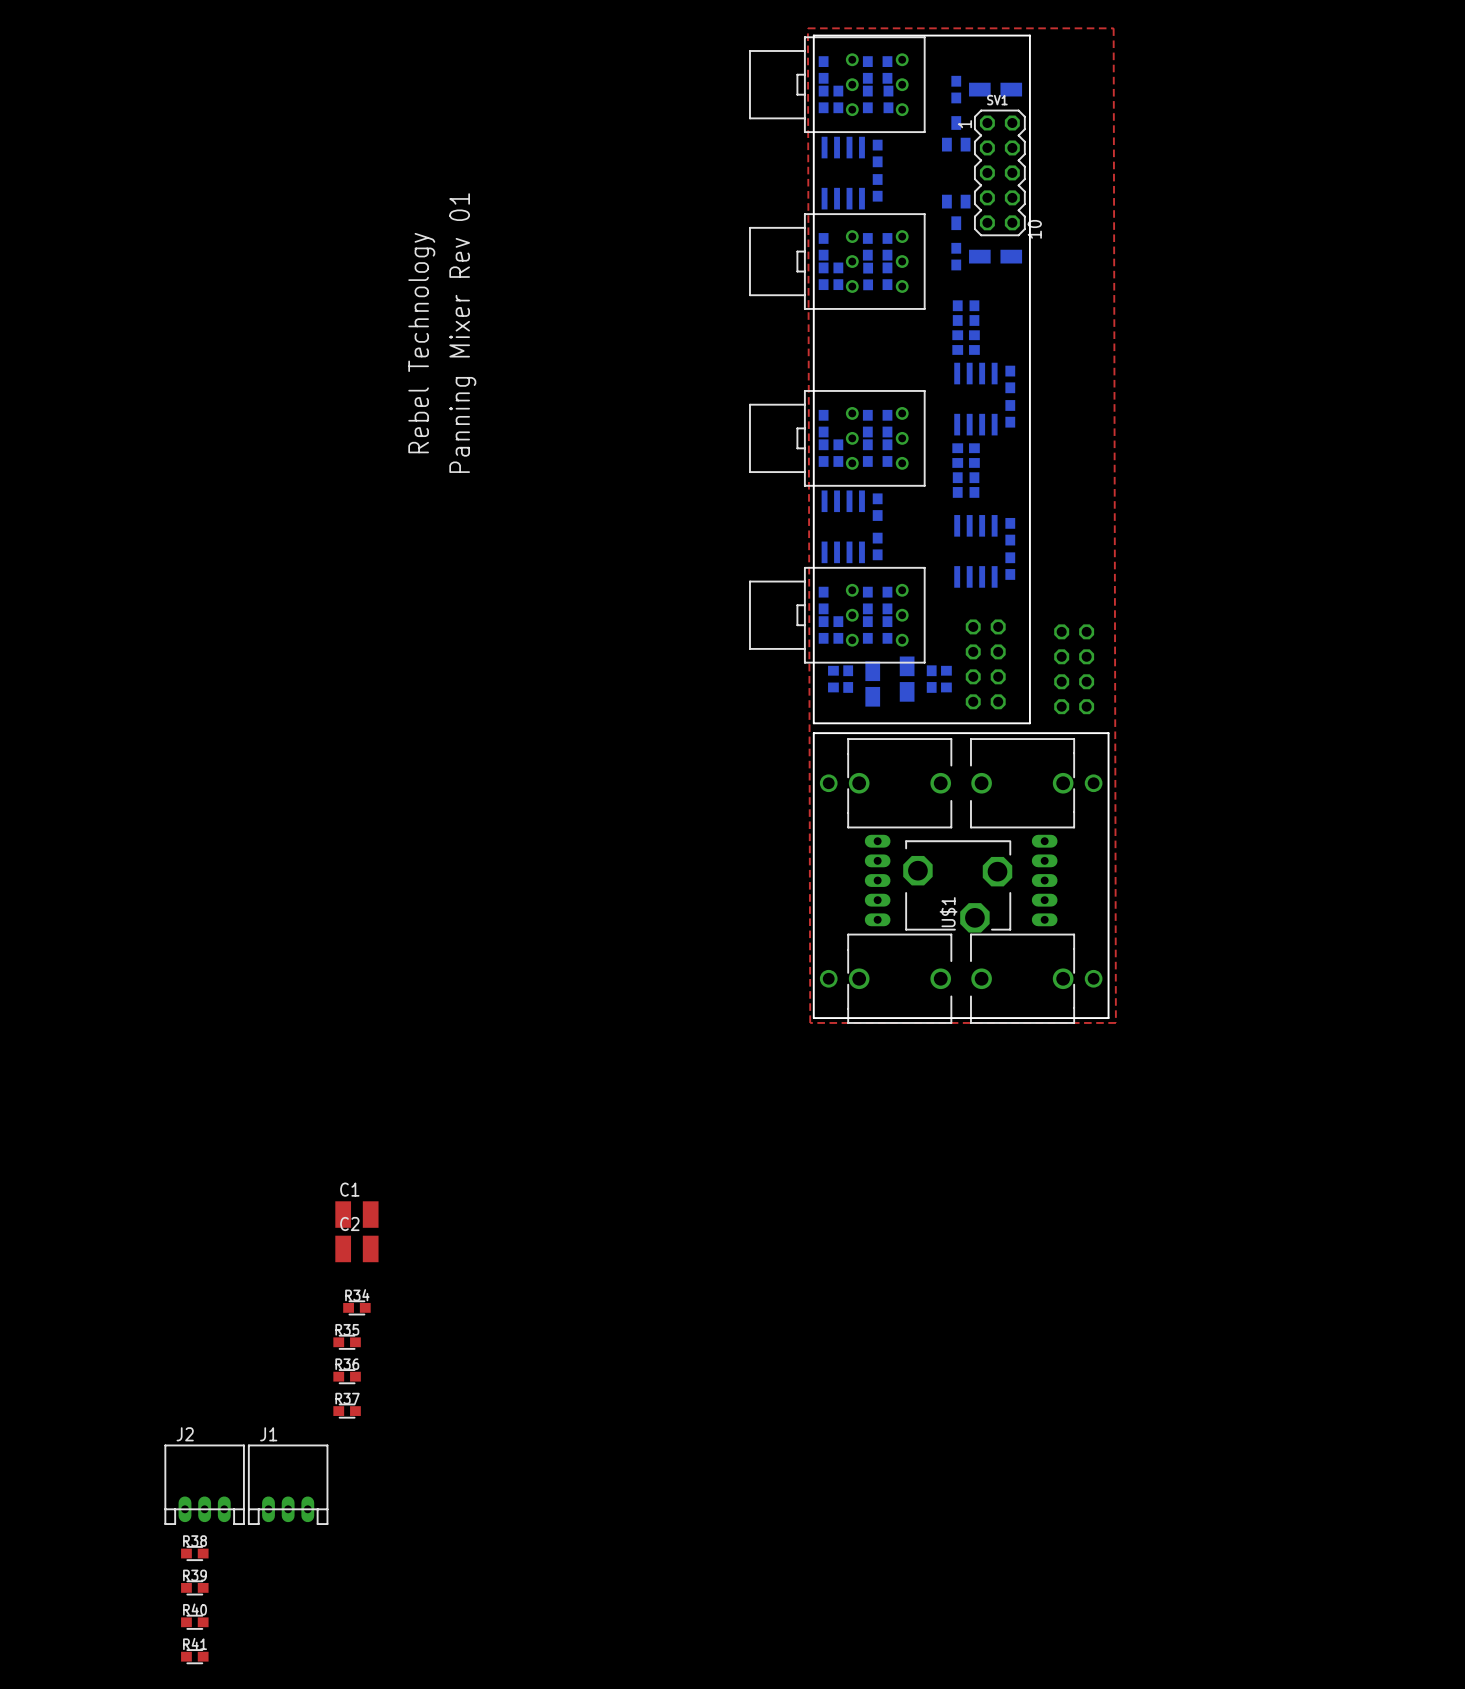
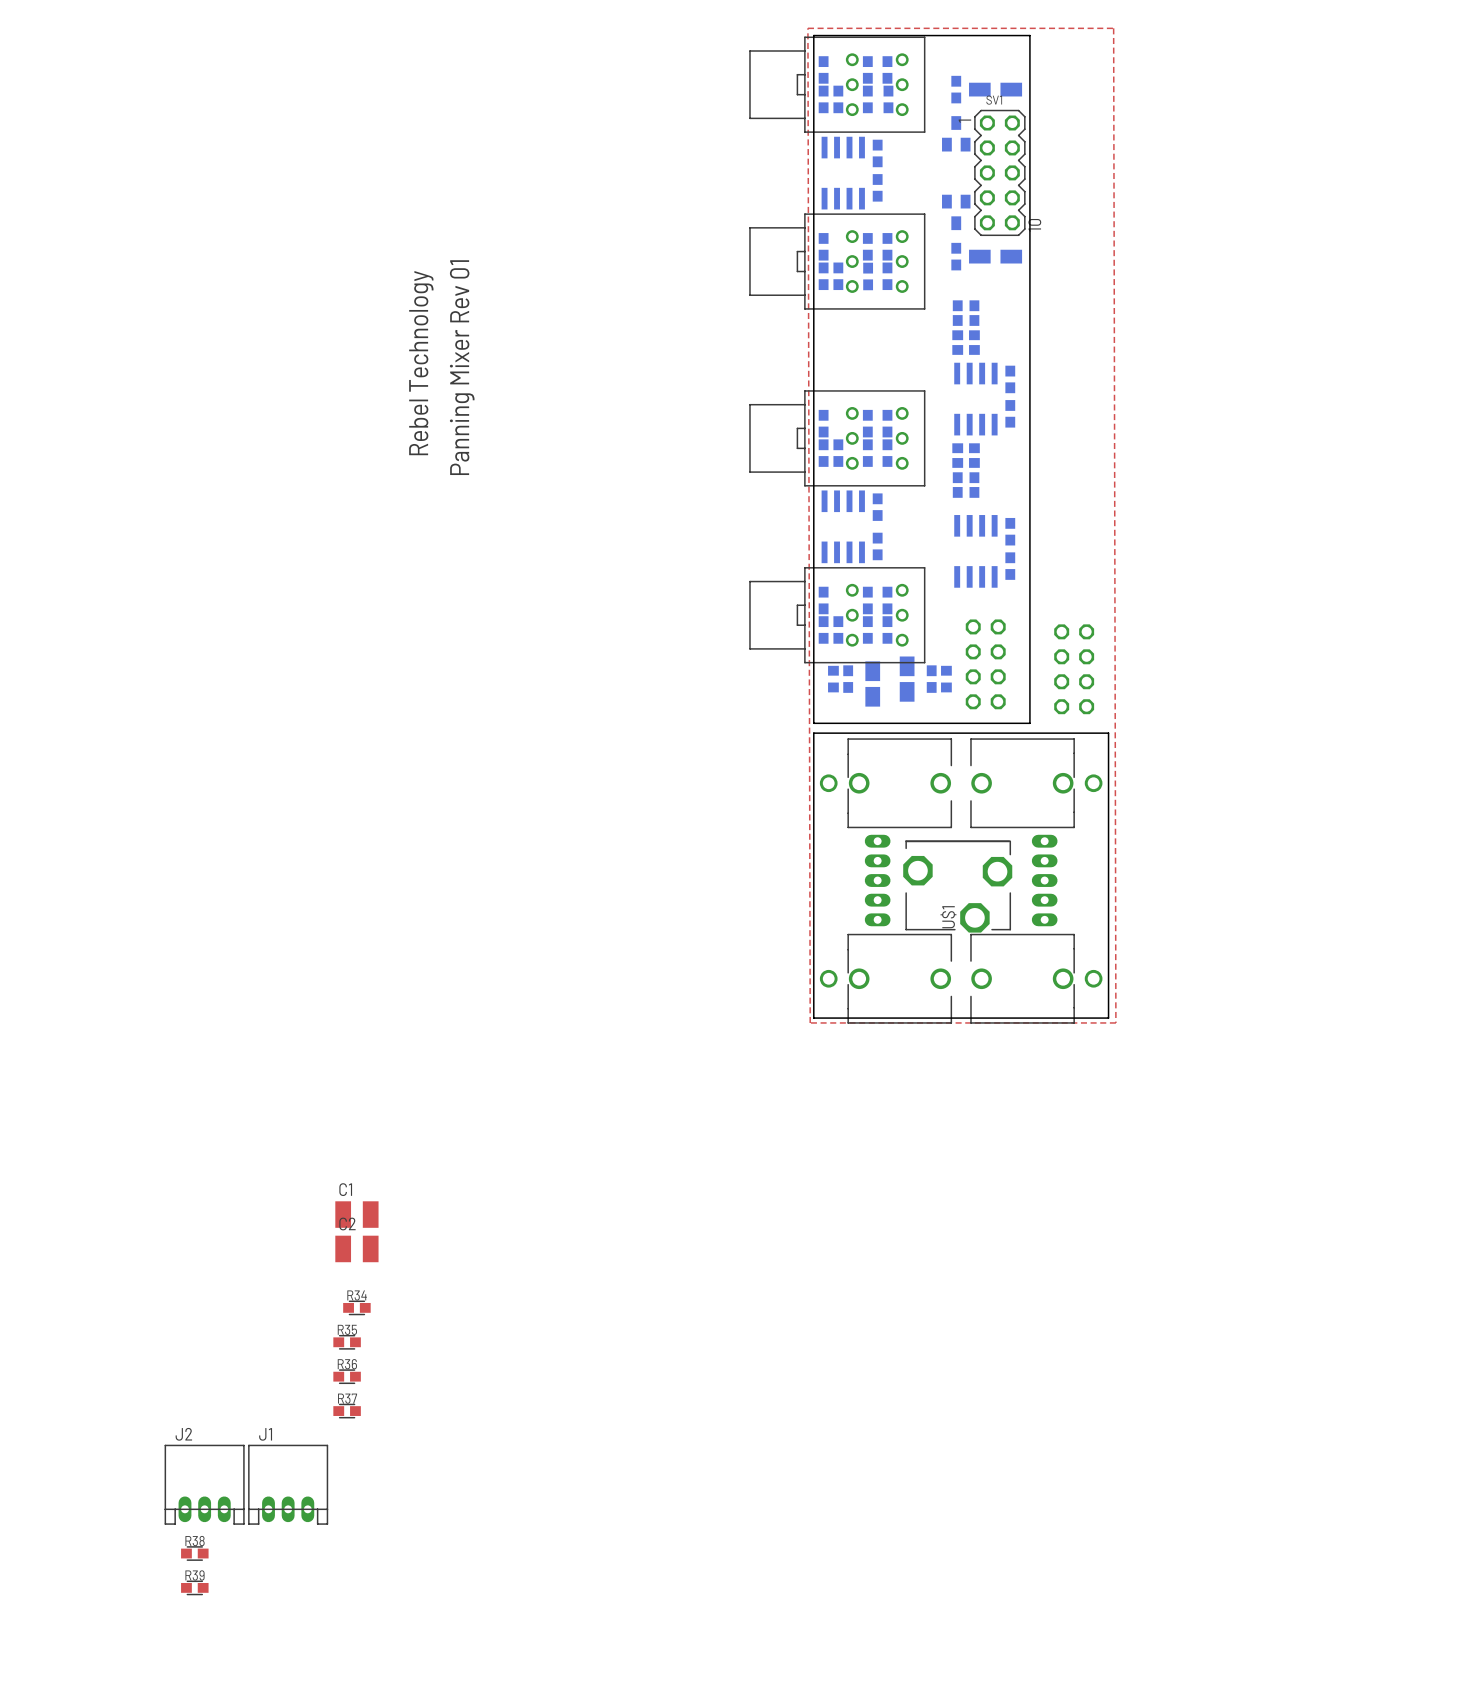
R40: (194, 1622) -> none
R41: (194, 1656) -> none

